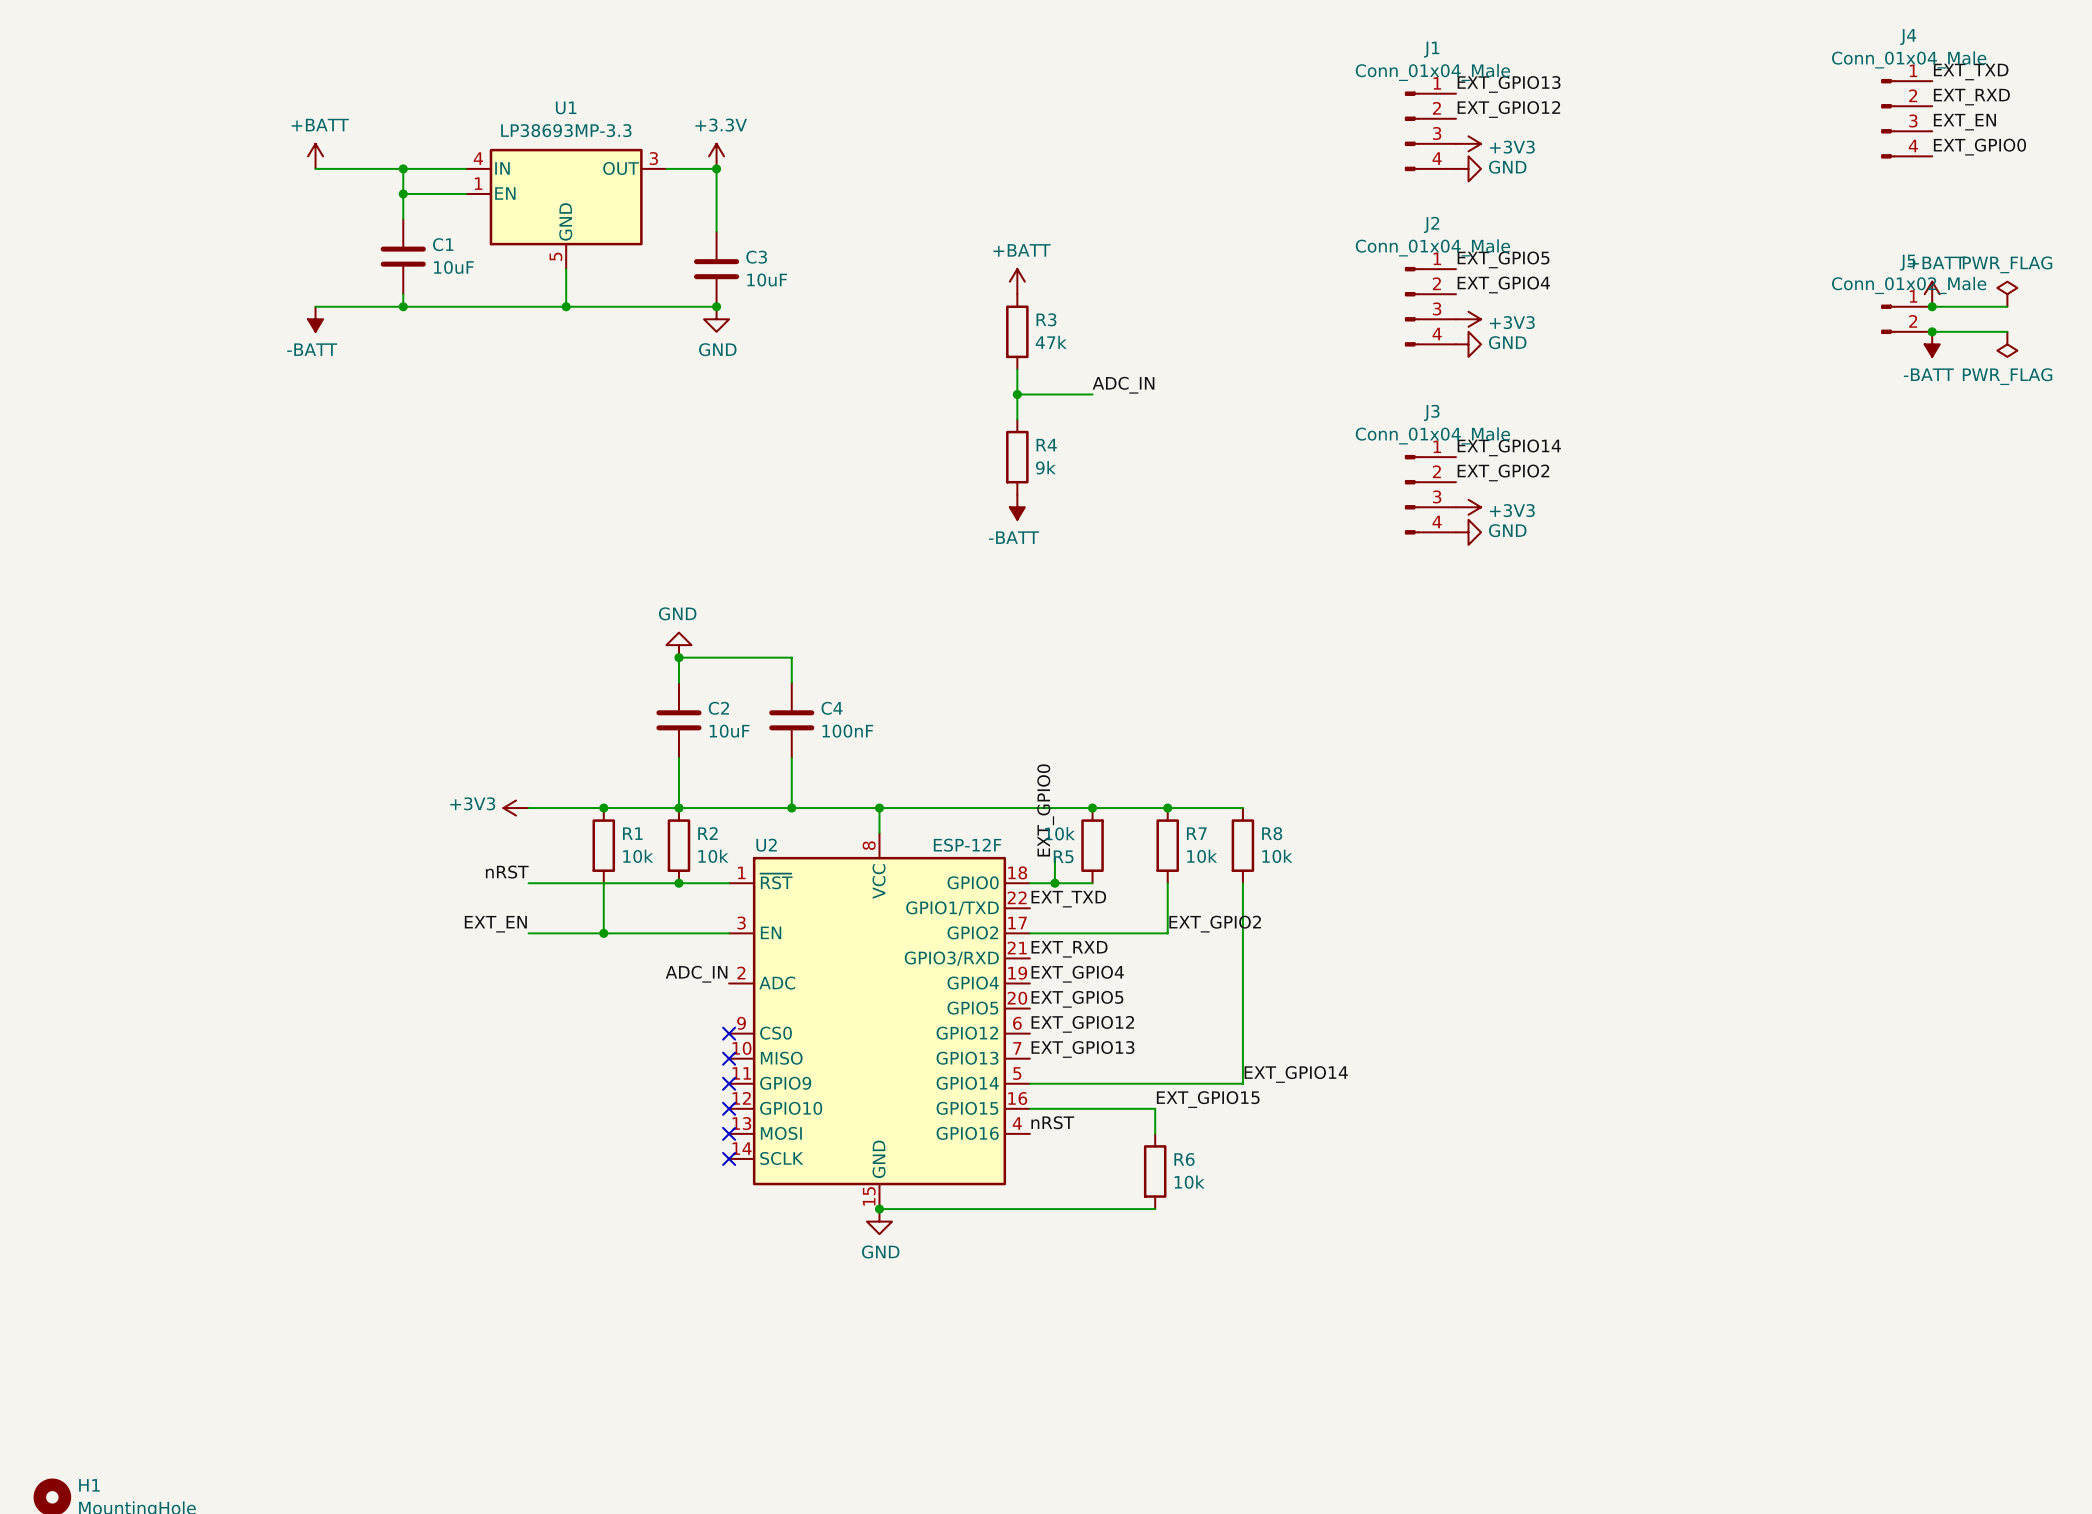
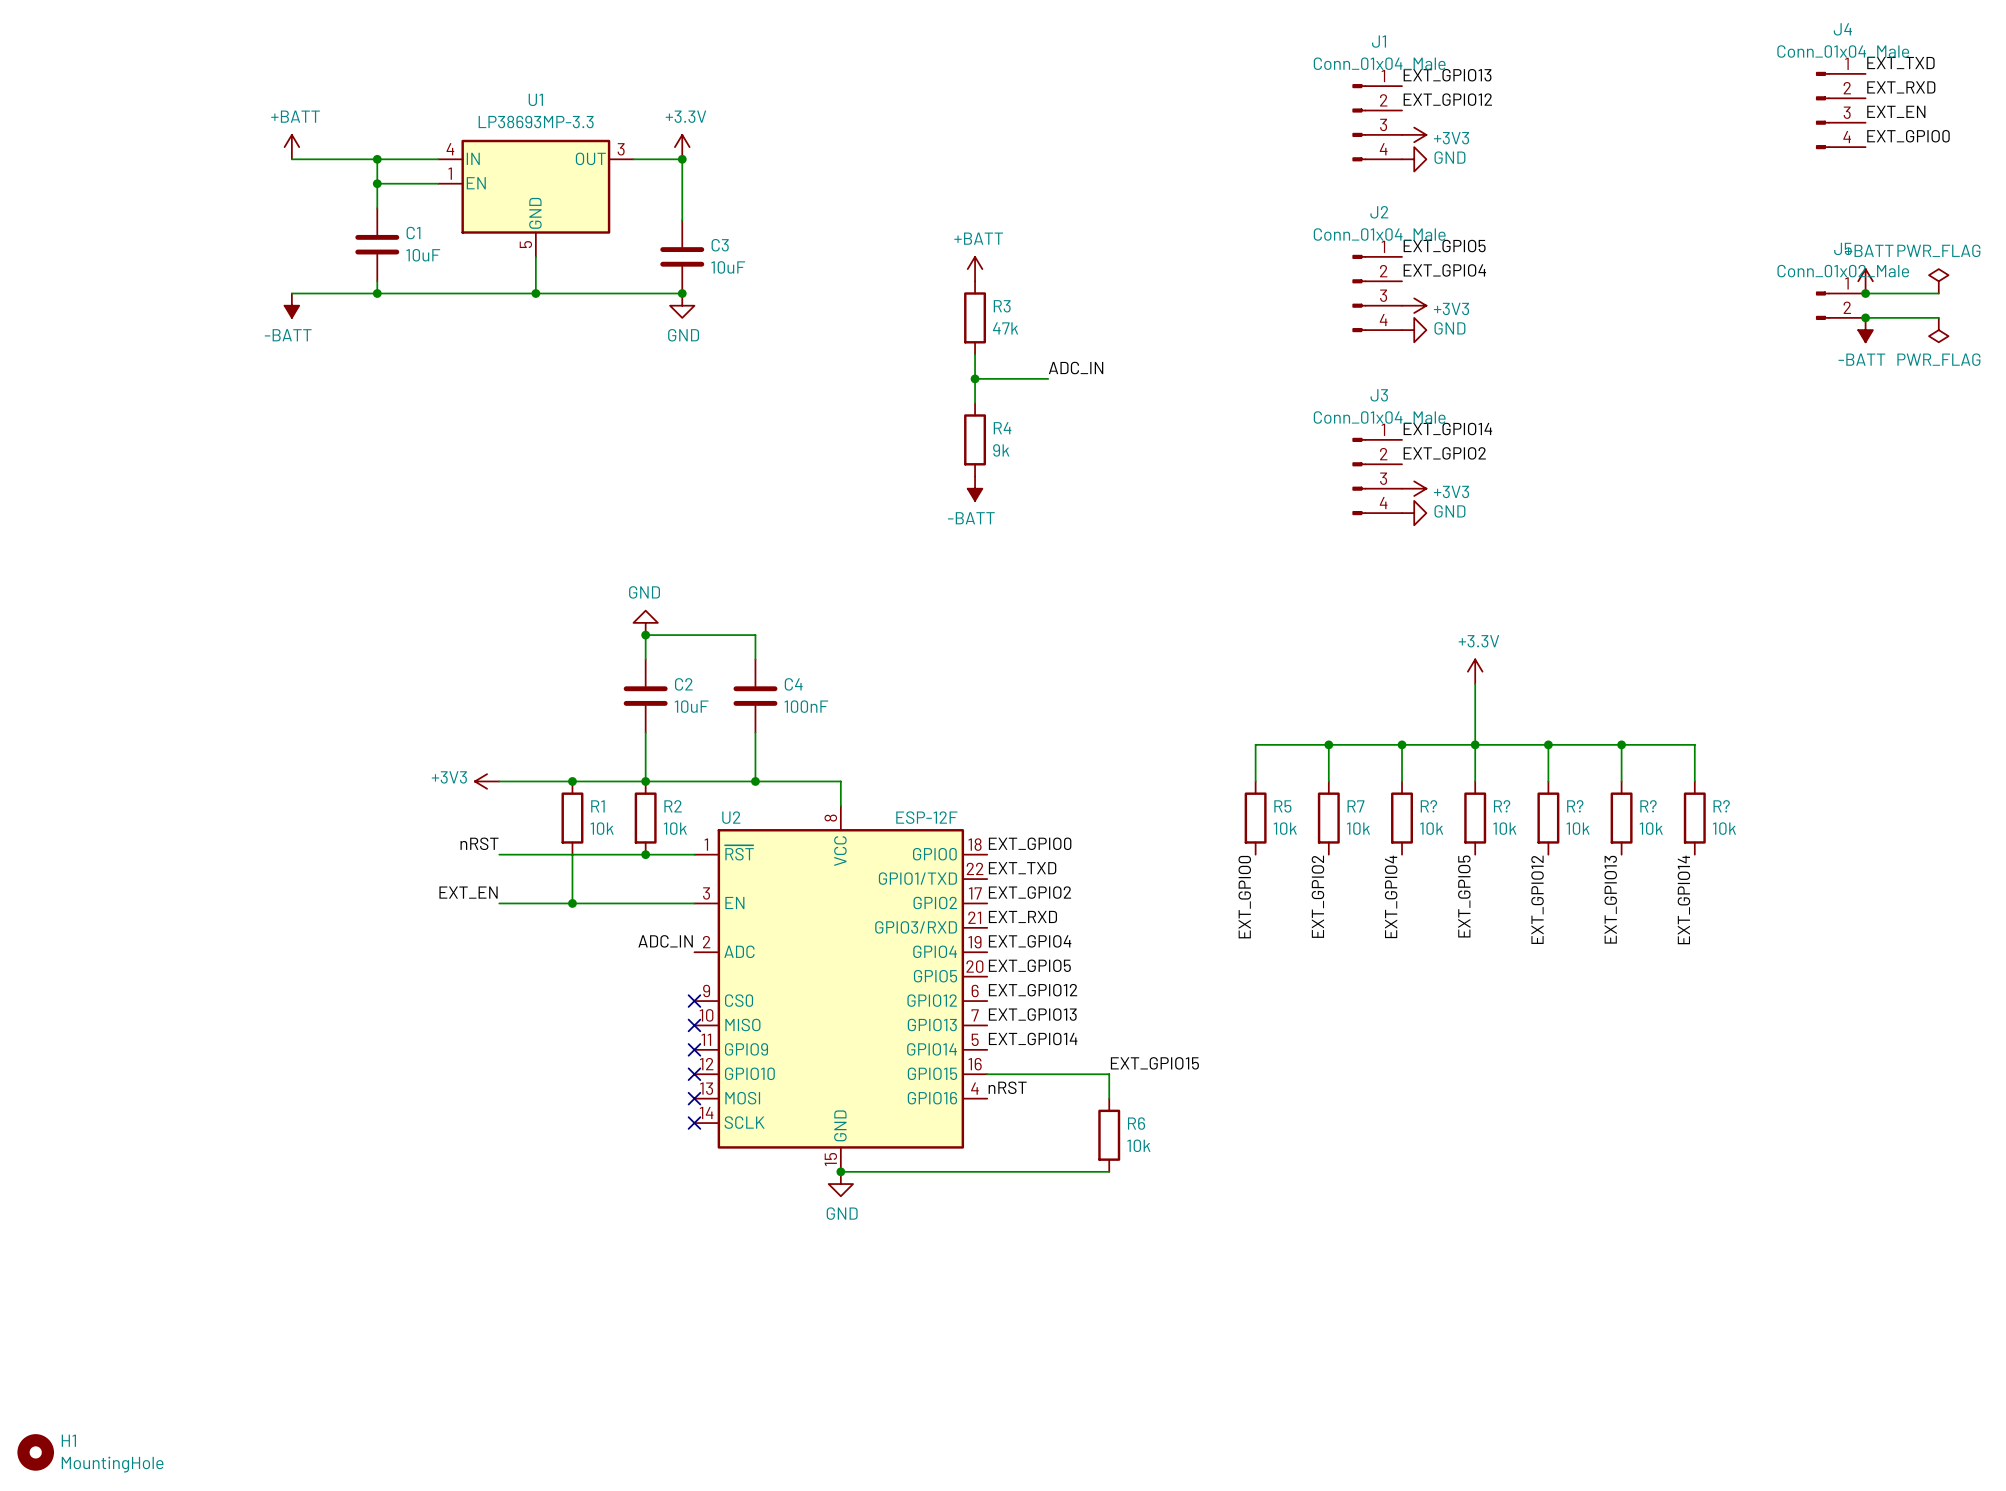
power symbol: none -> +3.3V (1475, 671)
wire: none -> (1475, 683) (1475, 781)
wire: none -> (1328, 744) (1328, 781)
junction: none -> (1328, 744)
wire: none -> (1402, 744) (1402, 781)
junction: none -> (1402, 744)
junction: none -> (1475, 744)
wire: none -> (1548, 744) (1548, 781)
junction: none -> (1548, 744)
wire: none -> (1621, 744) (1621, 781)
junction: none -> (1621, 744)
wire: (879, 808) (1242, 808) -> none
junction: (879, 808) -> none
junction: (1092, 808) -> none
junction: (1167, 808) -> none
wire: none -> (1255, 781) (1255, 744) (1694, 744) (1694, 781)
label rotation: 0° (1045, 810) -> 90° clockwise (1030, 843)
R5 value position: 10k (1059, 833) -> 10k (1285, 828)
R5 position: (1092, 845) -> (1255, 818)
R7 position: (1167, 845) -> (1328, 818)
R8: 10k (1242, 845) -> none
R?: none -> 10k (1402, 818)
R?: none -> 10k (1475, 818)
R?: none -> 10k (1548, 818)
R?: none -> 10k (1621, 818)
R?: none -> 10k (1694, 818)
R5 name position: R5 (1063, 856) -> R5 (1282, 806)
wire: (1054, 858) (1054, 883) -> none
wire: (1029, 883) (1092, 883) -> none
junction: (1054, 883) -> none
wire: (1167, 883) (1167, 933) (1029, 933) -> none
wire: (1242, 883) (1242, 1083) (1029, 1083) -> none
label: none -> EXT_GPIO2 (1029, 892)
label: EXT_GPIO2 (1215, 924) -> EXT_GPIO0 (1244, 897)
label: none -> EXT_GPIO2 (1317, 896)
label: none -> EXT_GPIO4 (1391, 896)
label: none -> EXT_GPIO5 (1464, 896)
label: none -> EXT_GPIO14 (1683, 899)
label: none -> EXT_GPIO12 (1537, 899)
label: none -> EXT_GPIO13 (1610, 899)
label position: EXT_GPIO14 (1296, 1074) -> EXT_GPIO14 (1033, 1038)

